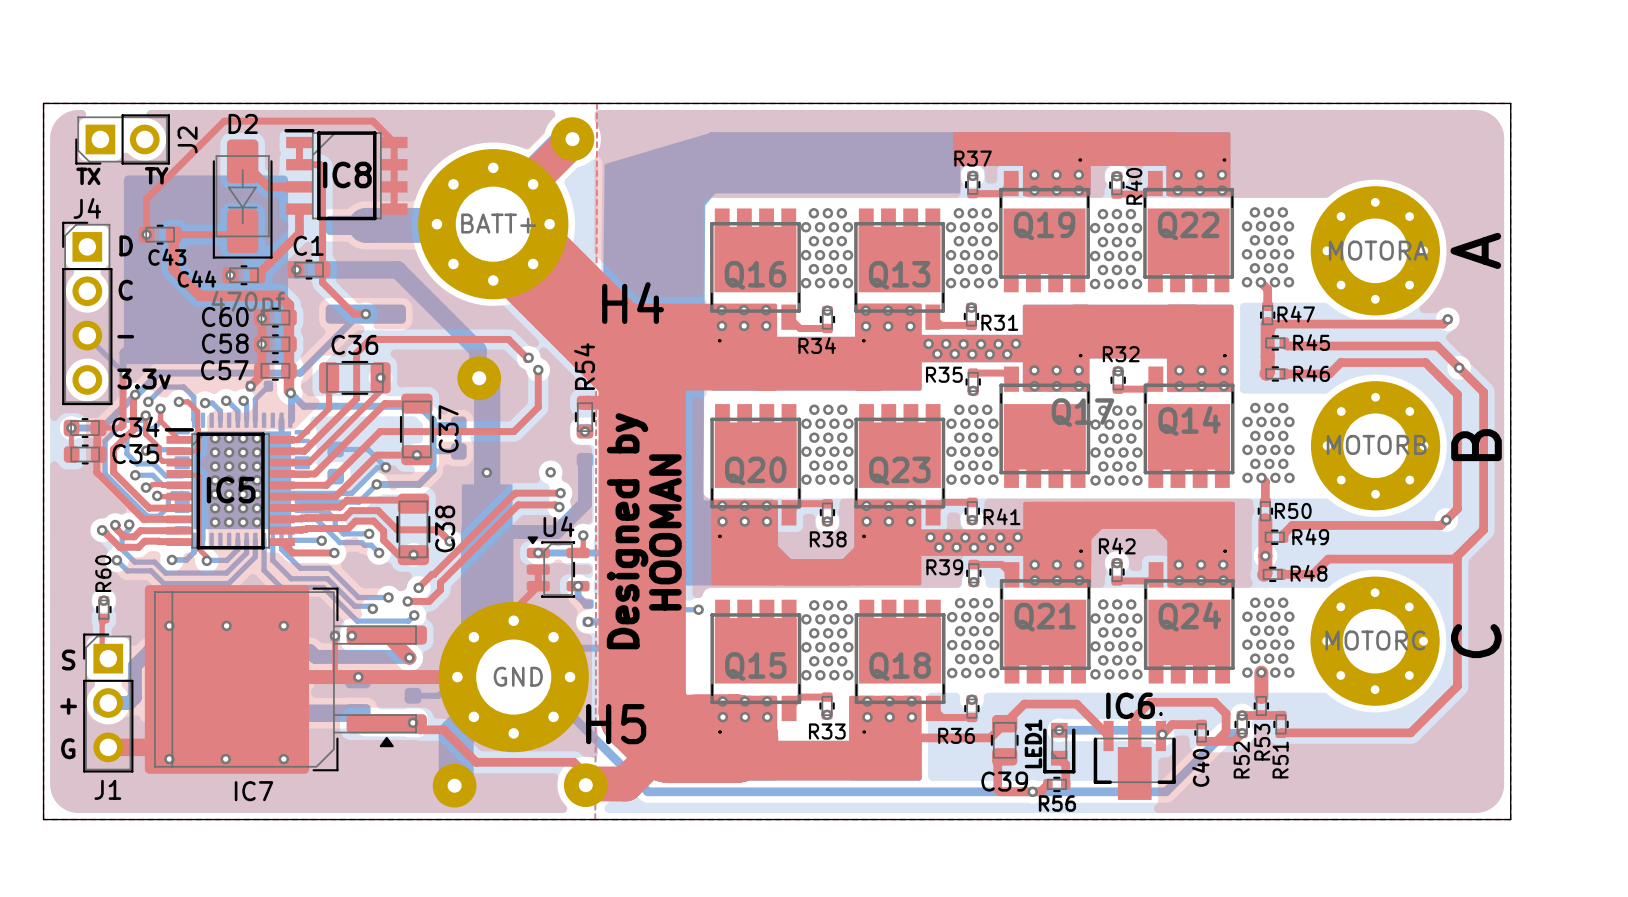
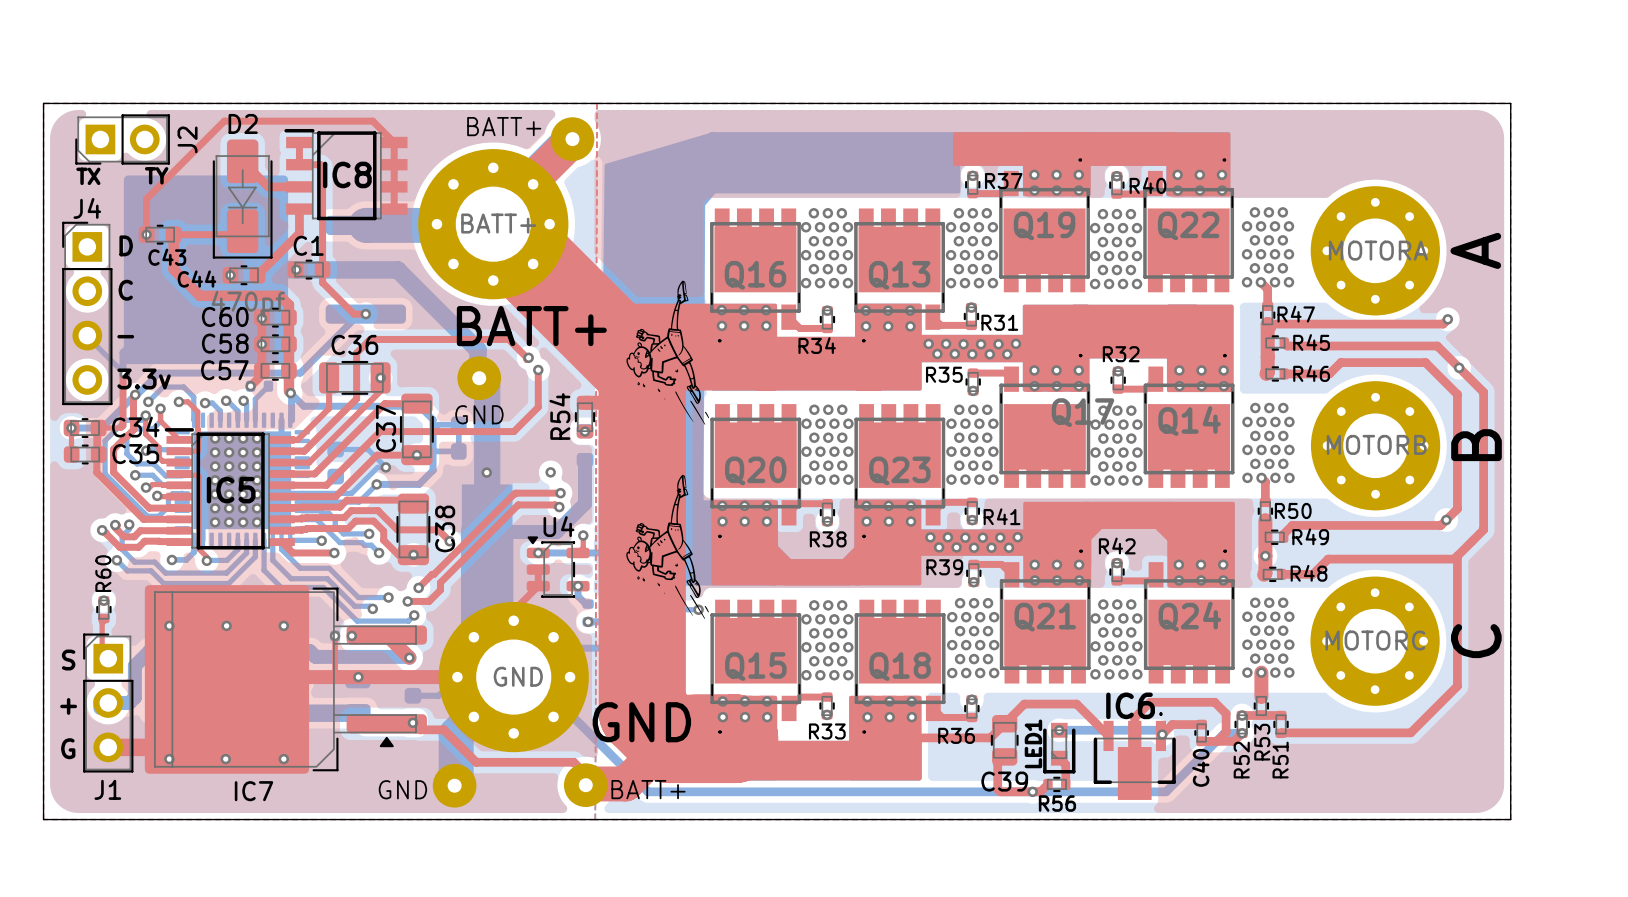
BATT+ name: none -> BATT+ (504, 126)
R37 name position: R37 (973, 158) -> R37 (1003, 181)
R40 name rotation: 0° (1133, 186) -> 90° clockwise (1148, 185)
drawing: none -> [626, 280, 710, 425]
H4 name: H4 (633, 303) -> BATT+ (531, 326)
R54 name position: R54 (584, 366) -> R54 (559, 416)
GND name: none -> GND (479, 414)
C37 name position: C37 (448, 428) -> C37 (386, 428)
drawing: none -> [626, 474, 709, 620]
text: Designed by (627, 531) -> none
text: HOOMAN (665, 532) -> none
H5 name: H5 (616, 724) -> GND (641, 722)
GND name: none -> GND (402, 789)
BATT+ name: none -> BATT+ (648, 789)

